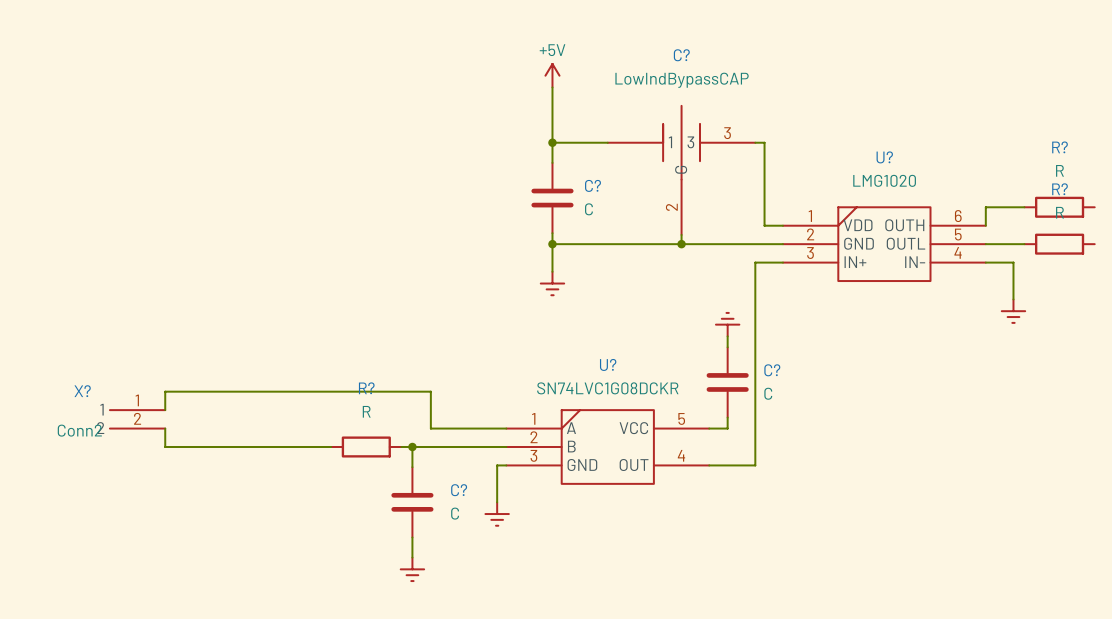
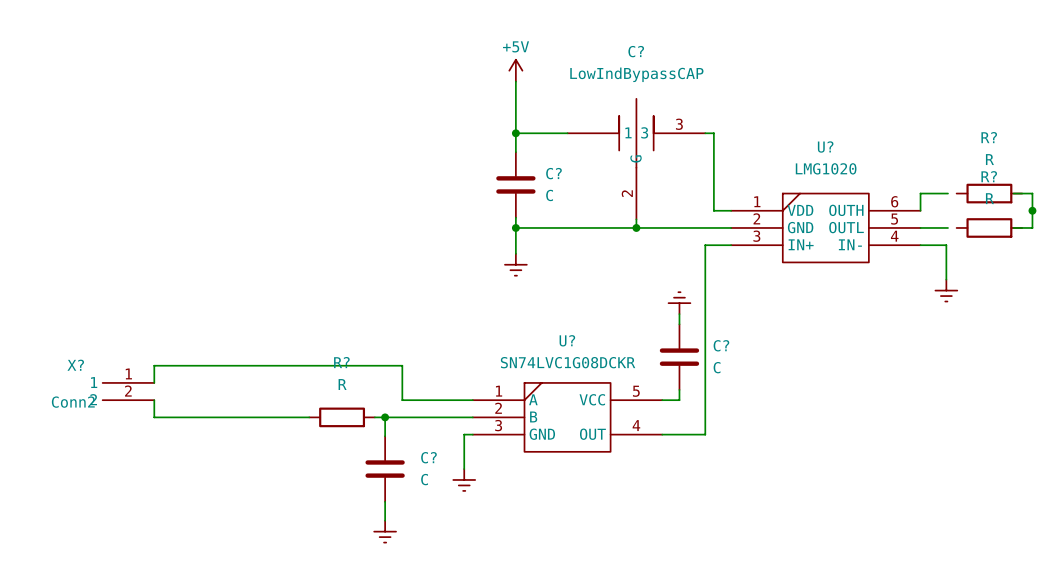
wire: (1015, 207) (1024, 207) -> none
wire: none -> (1013, 193) (1032, 193) (1032, 227) (1013, 227)
junction: none -> (1032, 210)
wire: (1015, 244) (1024, 244) -> none

